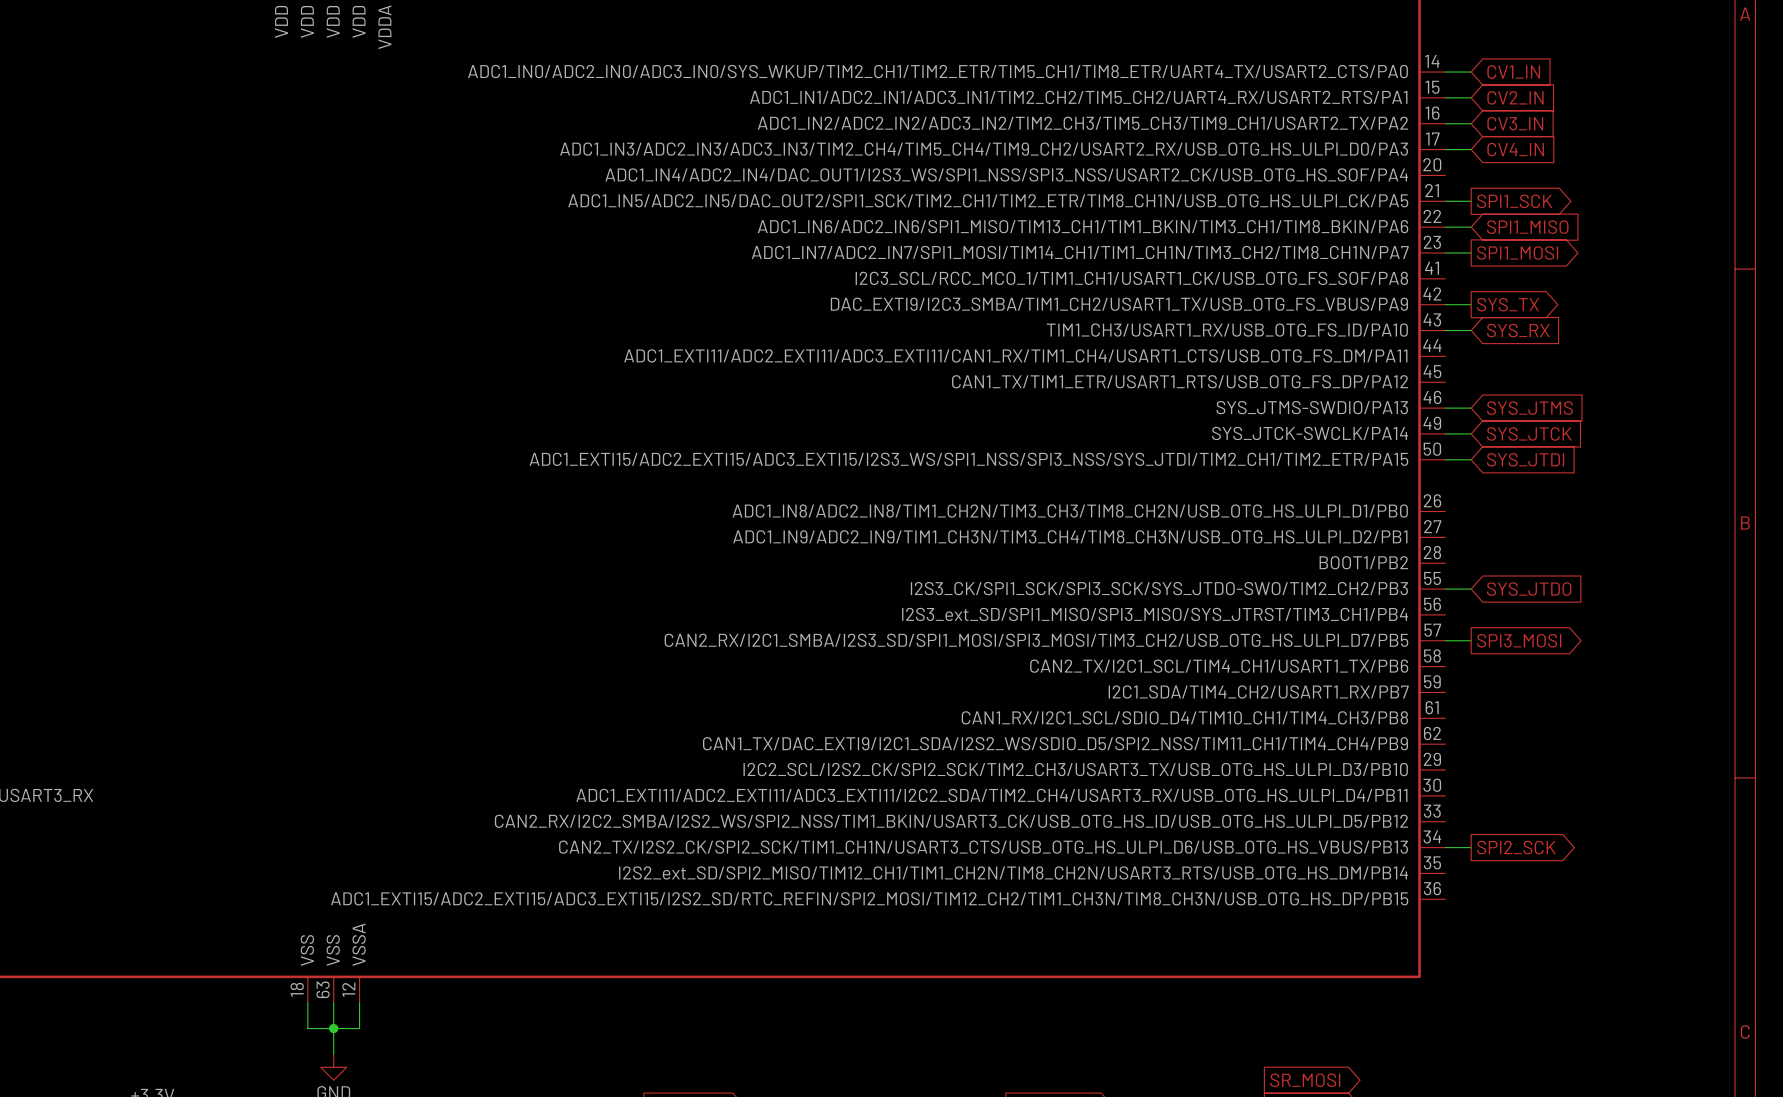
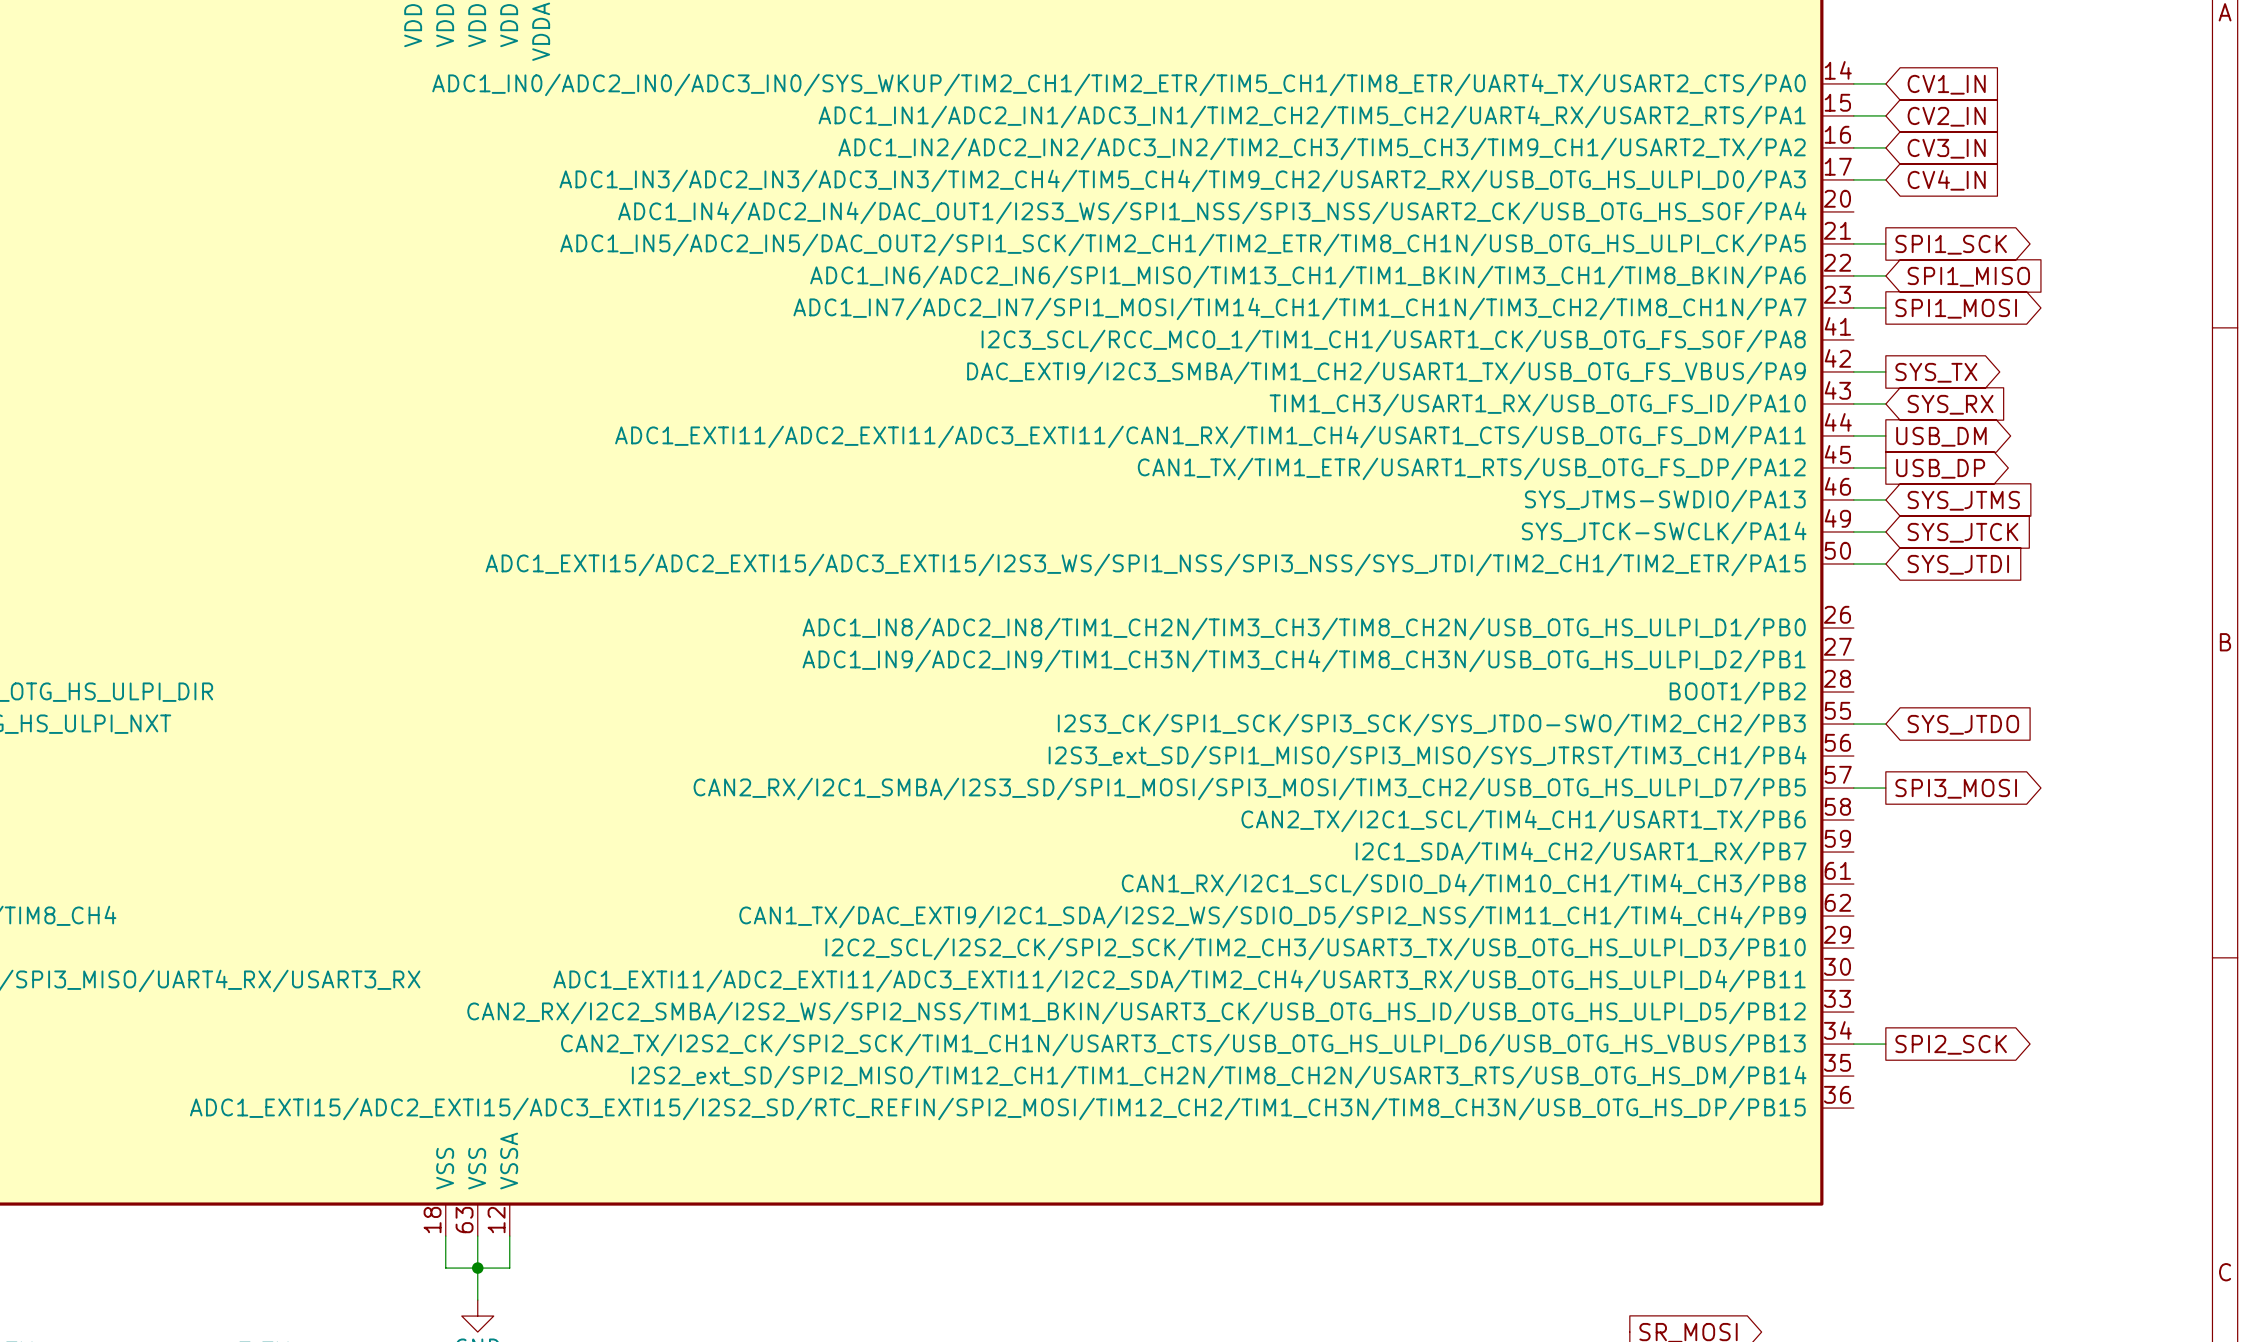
wire: none -> (1853, 435) (1885, 435)
global label: none -> USB_DM (1941, 436)
wire: none -> (1853, 467) (1885, 467)
global label: none -> USB_DP (1940, 468)

